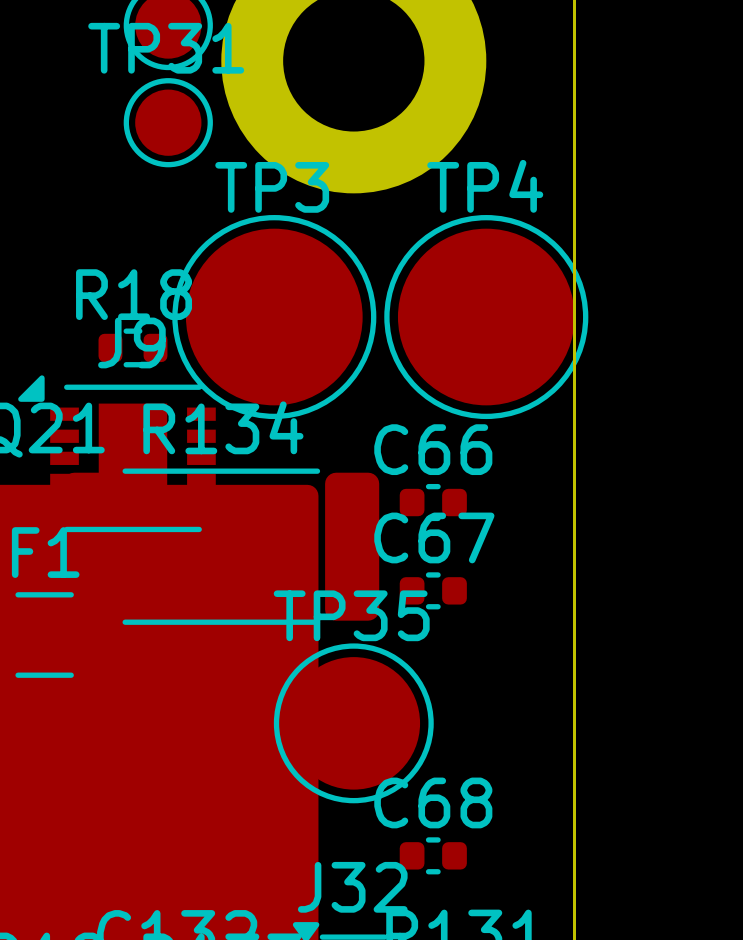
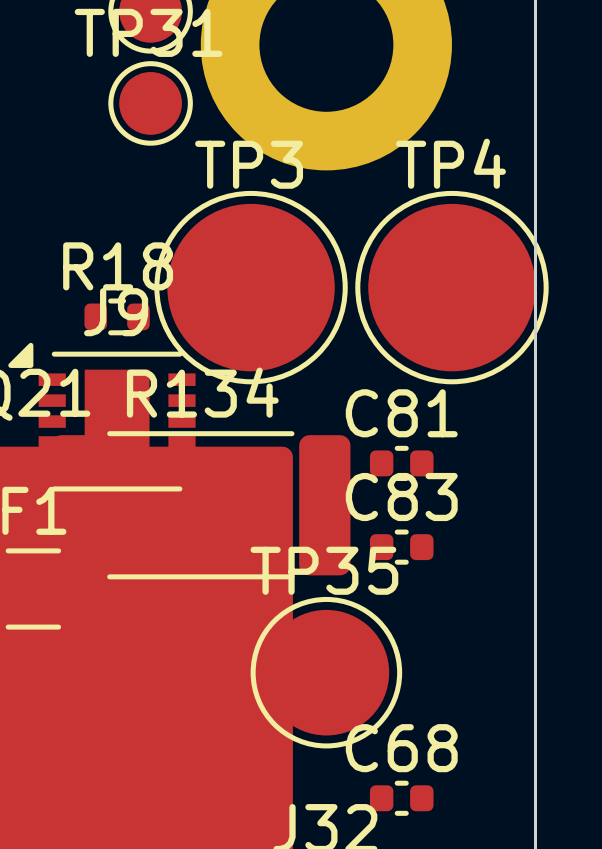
C66 name: C66 (433, 449) -> C81 (401, 413)
C67 name: C67 (434, 537) -> C83 (401, 497)

